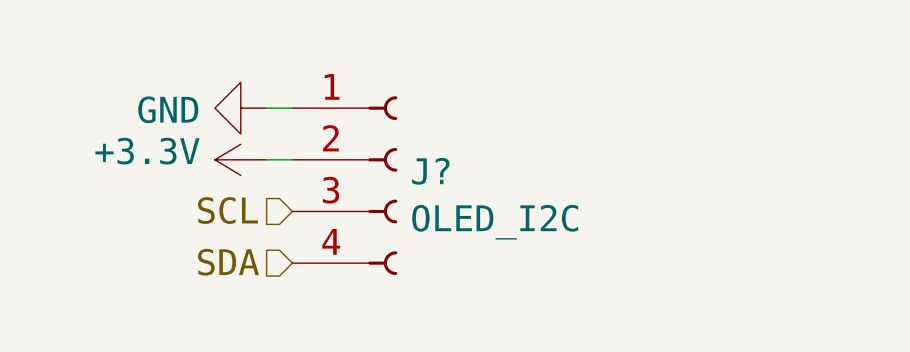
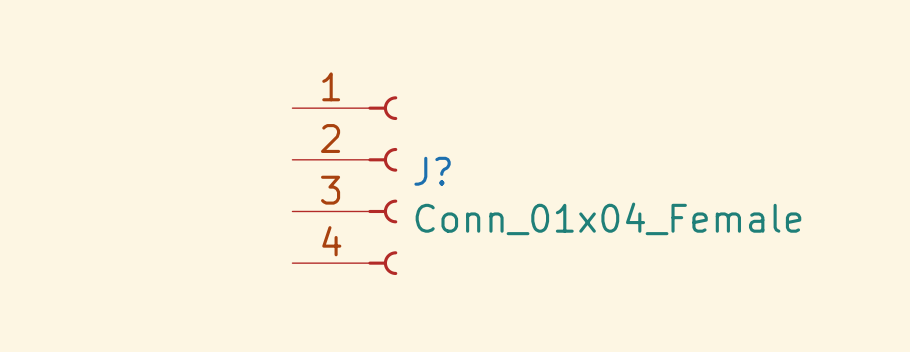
power symbol: GND (240, 108) -> none
wire: (266, 108) (292, 108) -> none
power symbol: +3.3V (240, 159) -> none
wire: (266, 159) (292, 159) -> none
hierarchical label: SCL (228, 210) -> none
J? value: OLED_I2C (495, 222) -> Conn_01x04_Female (608, 218)
hierarchical label: SDA (228, 262) -> none

